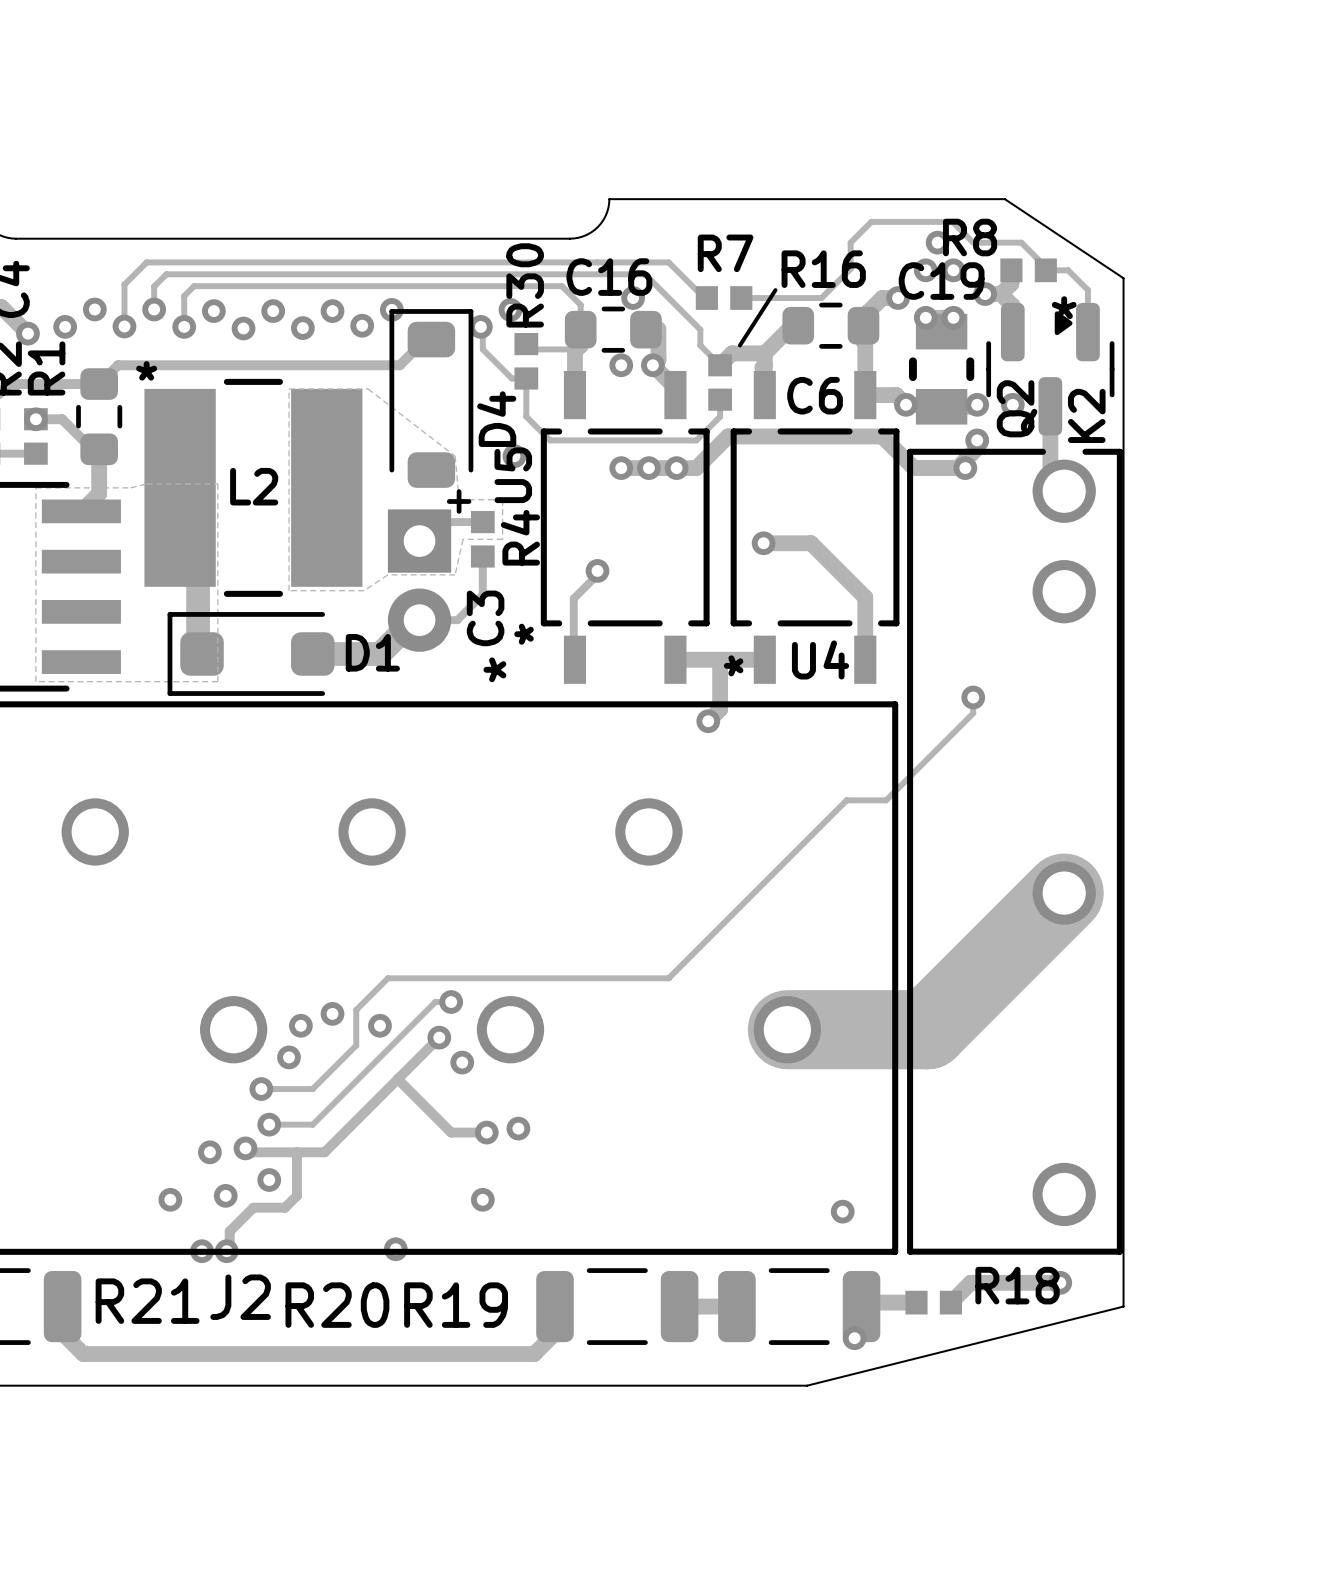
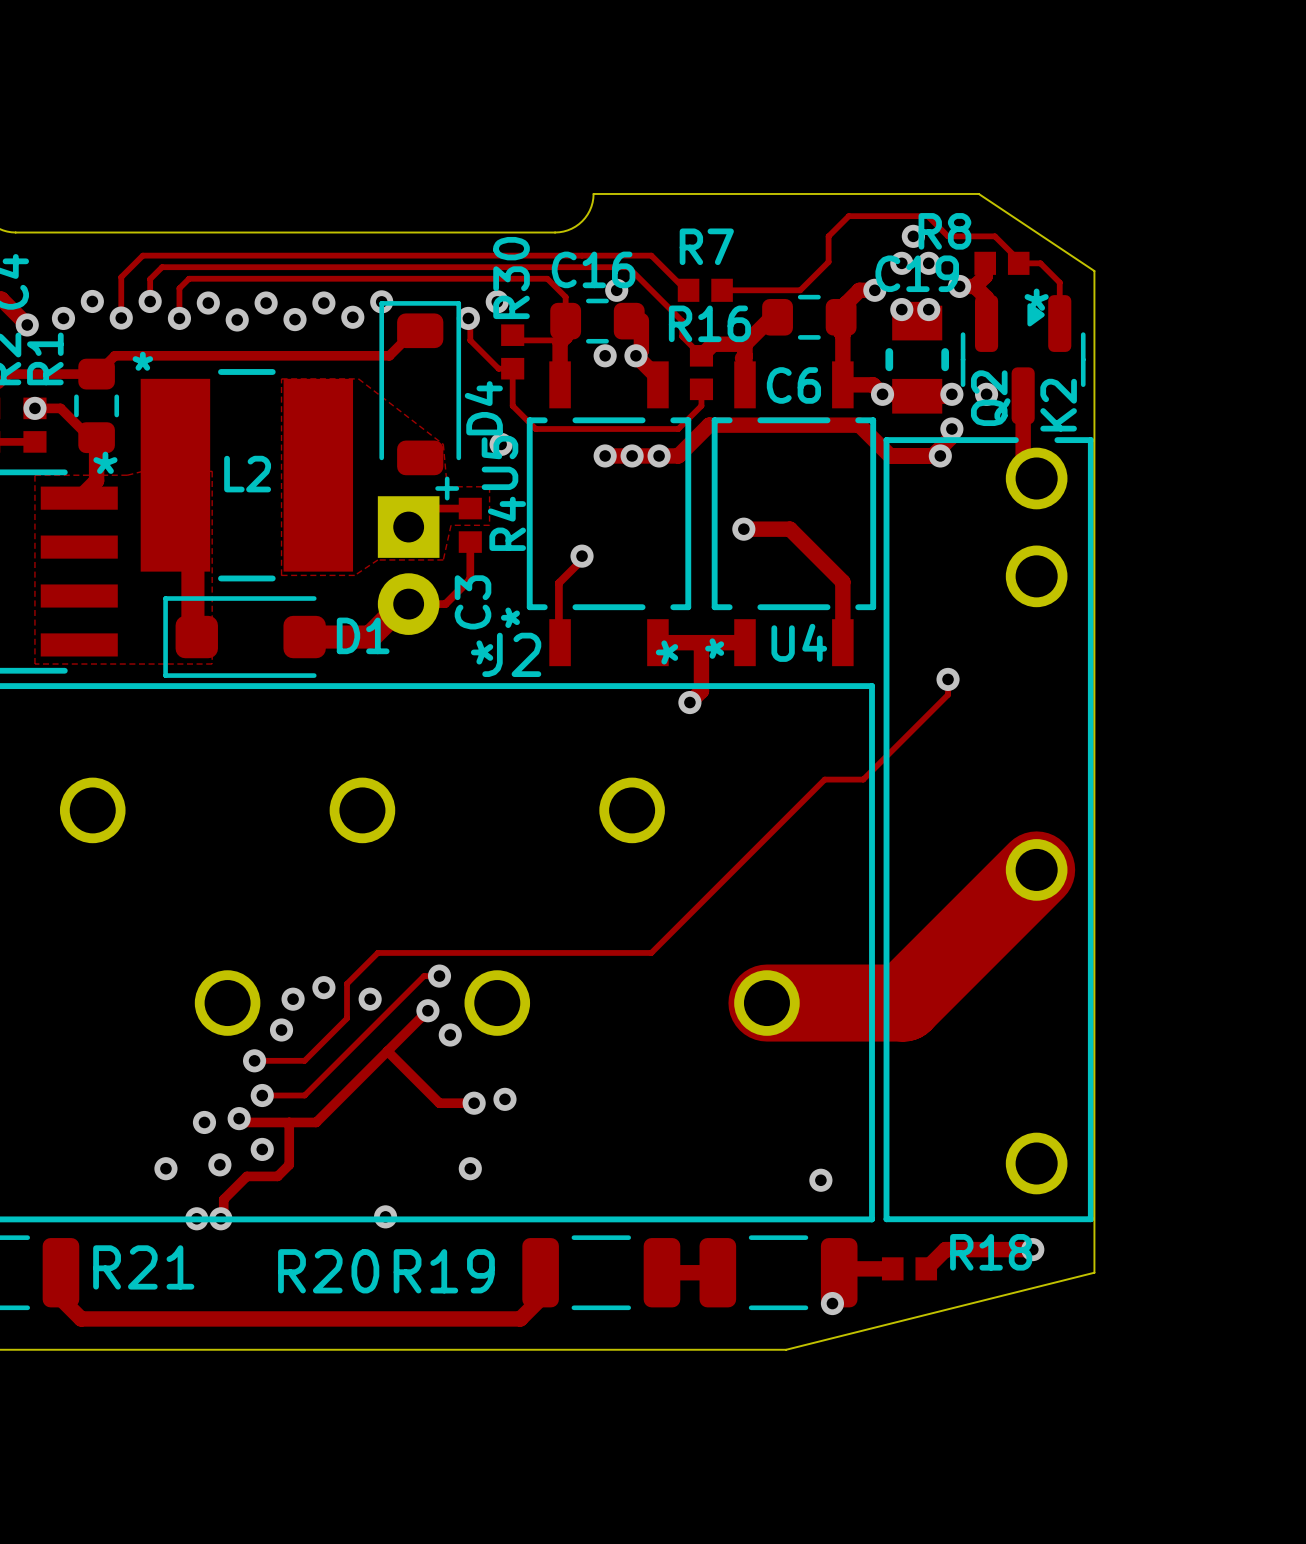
R16 name position: R16 (823, 269) -> R16 (709, 323)
line: (775, 290) (739, 345) -> none
L2 text: none -> * (105, 462)
U4 text: none -> * (666, 652)
J2 name position: J2 (240, 1297) -> J2 (511, 654)

